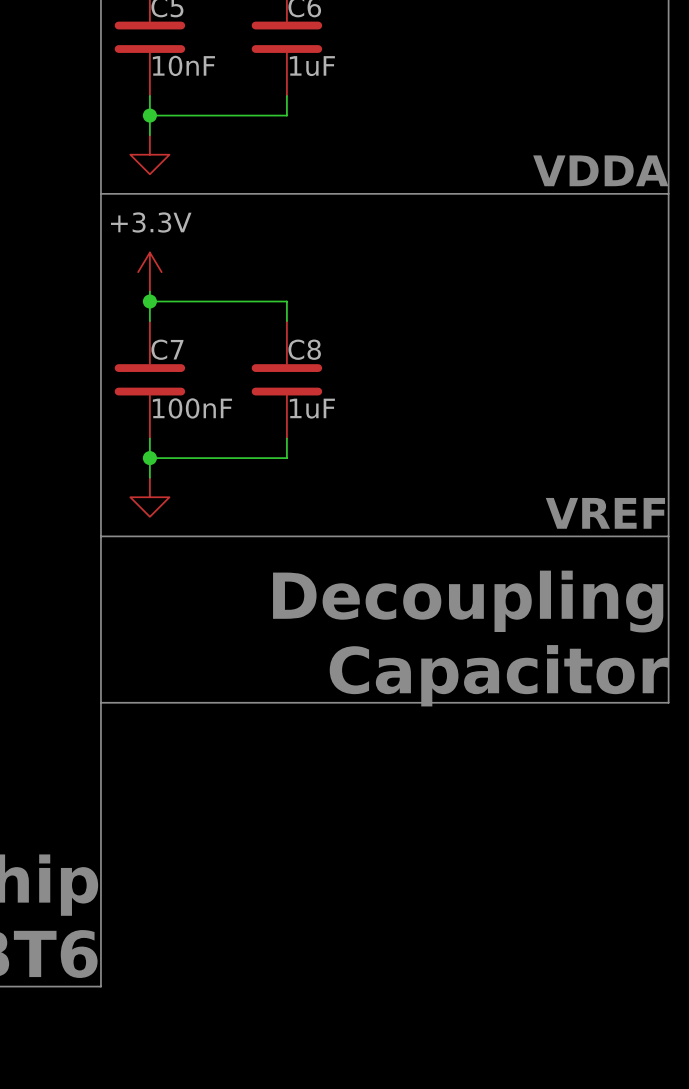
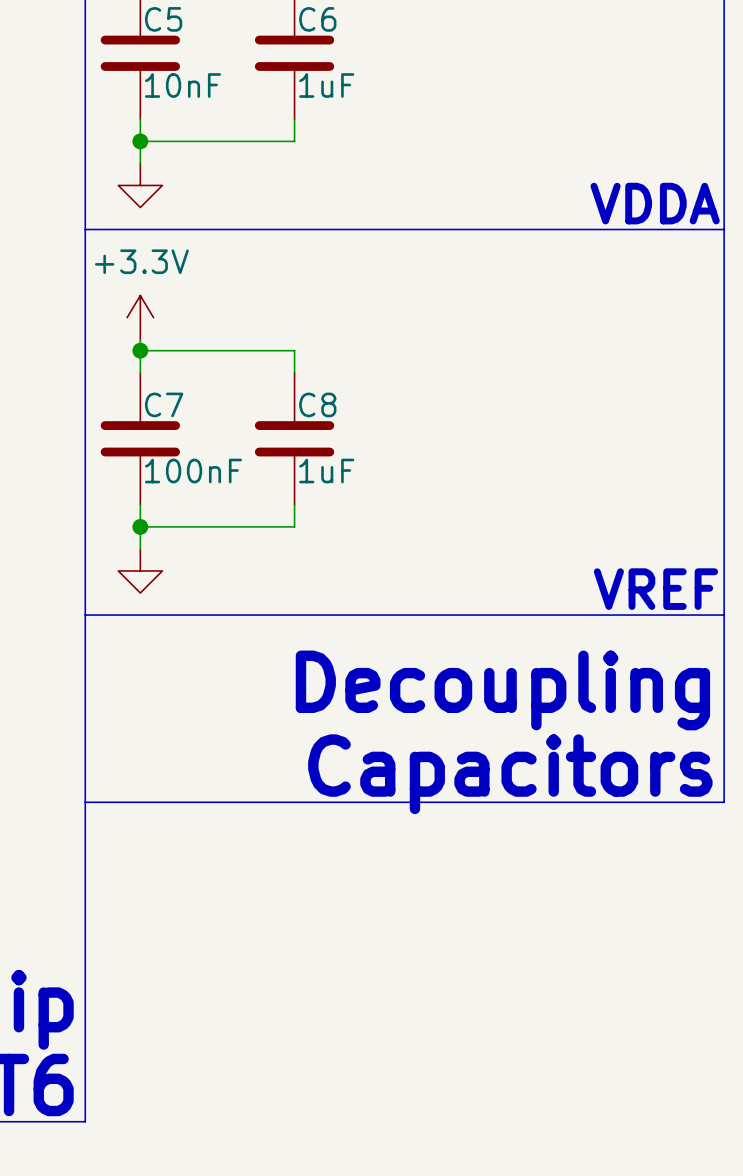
text: Capacitor (499, 675) -> Capacitors (510, 774)

